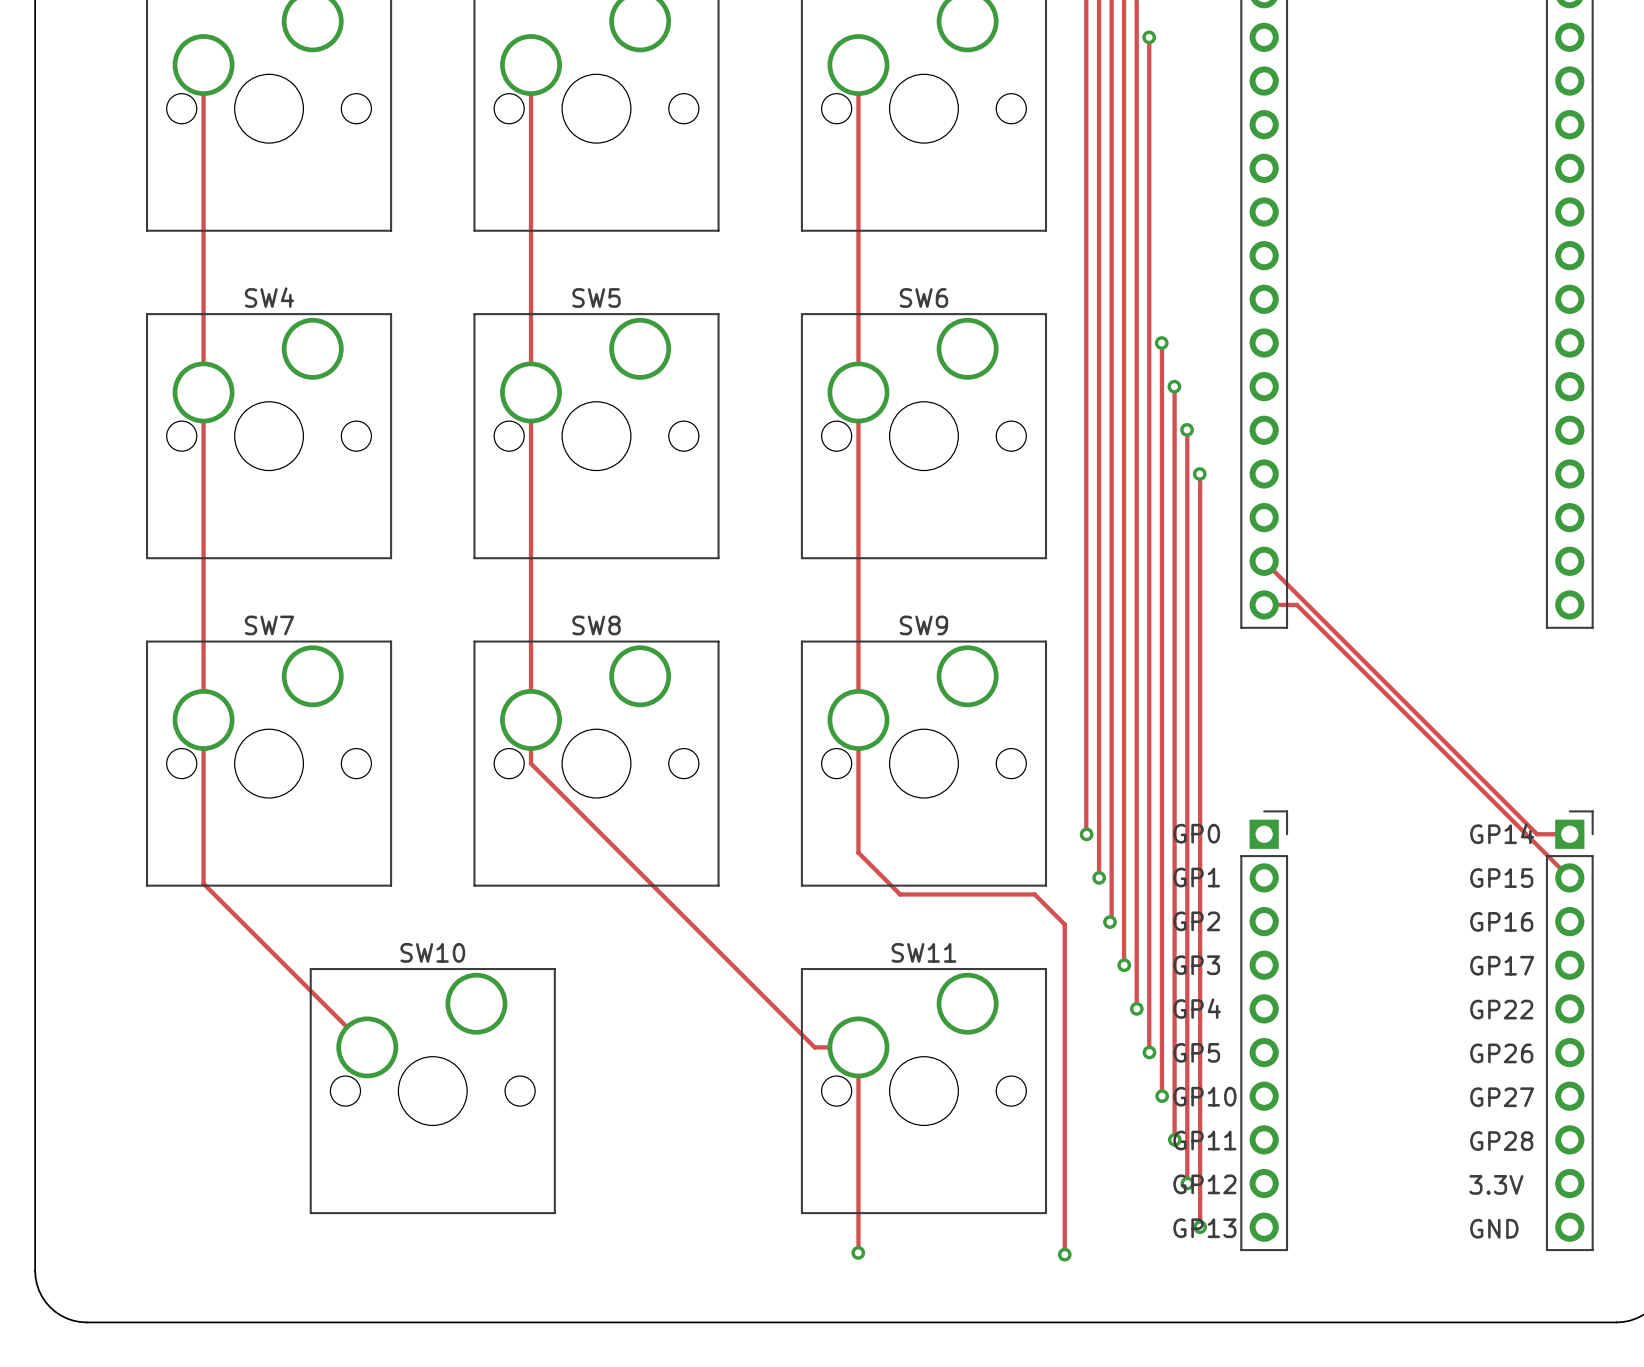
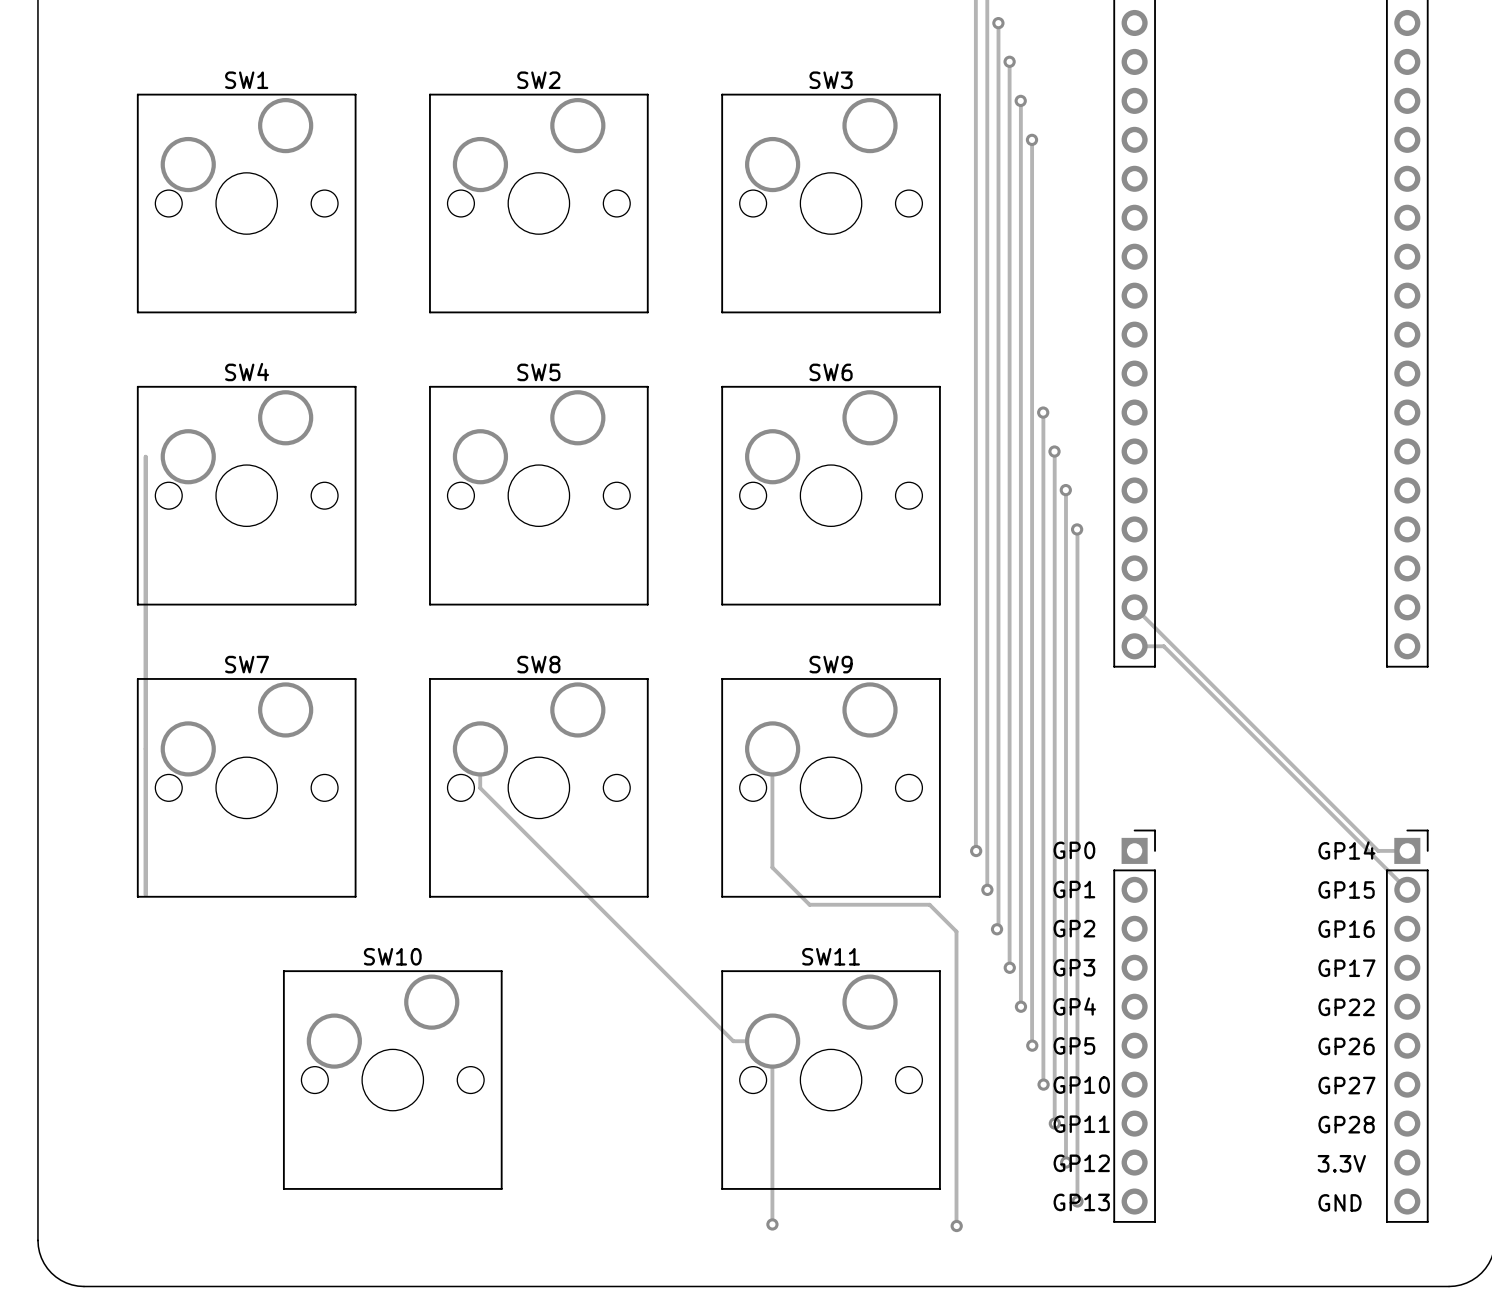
track: (203, 65) (203, 883) (367, 1047) -> none
track: (531, 65) (531, 763) (814, 1047) (858, 1047) (858, 1252) -> (480, 749) (480, 788) (733, 1041) (772, 1041) (772, 1224)
track: (858, 65) (858, 852) (900, 894) (1034, 894) (1064, 924) (1064, 1254) -> (772, 749) (772, 867) (809, 904) (929, 904) (956, 931) (956, 1226)
track: none -> (145, 456) (145, 895)

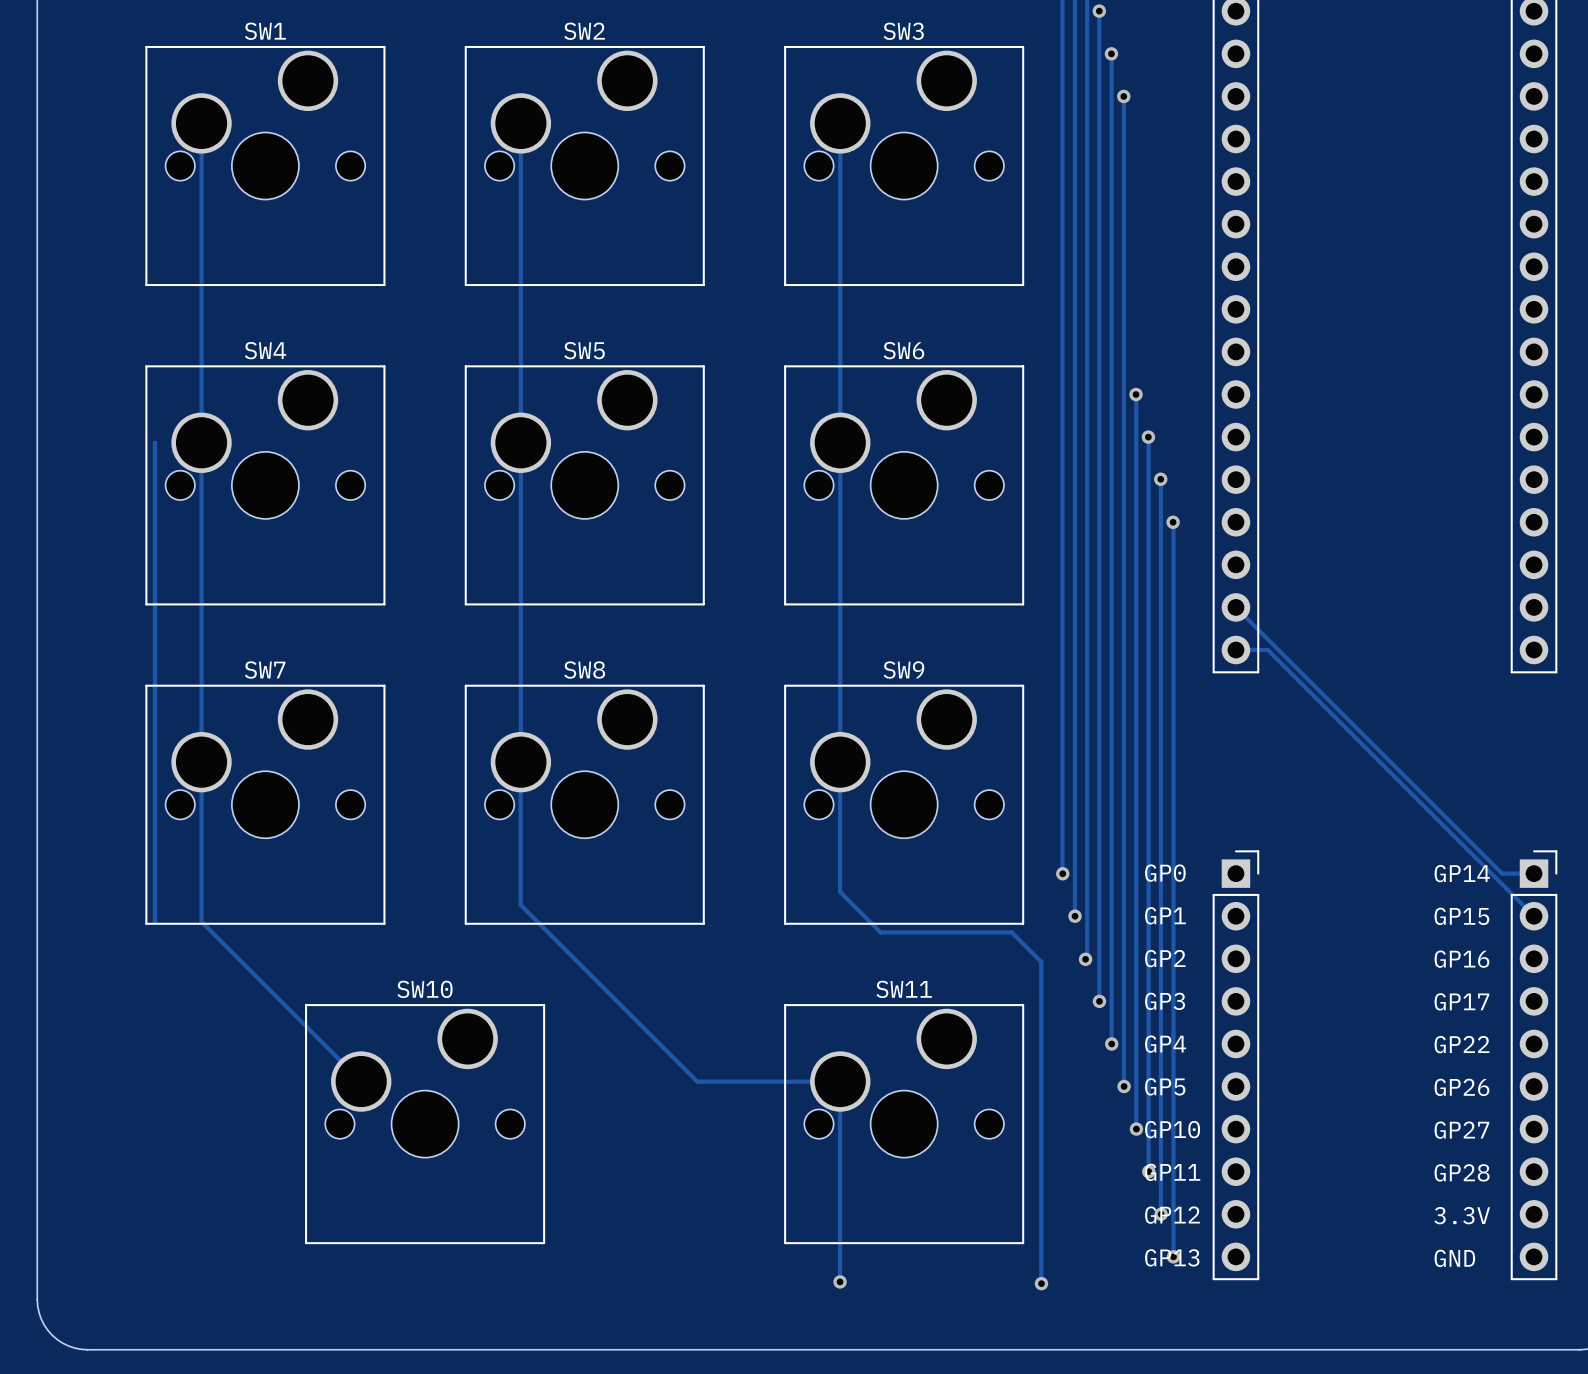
track: none -> (201, 123) (201, 921) (361, 1081)
track: none -> (520, 123) (520, 762)
track: none -> (840, 123) (840, 762)
track: (480, 788) (733, 1041) -> (520, 804) (520, 905) (697, 1081) (797, 1081)

